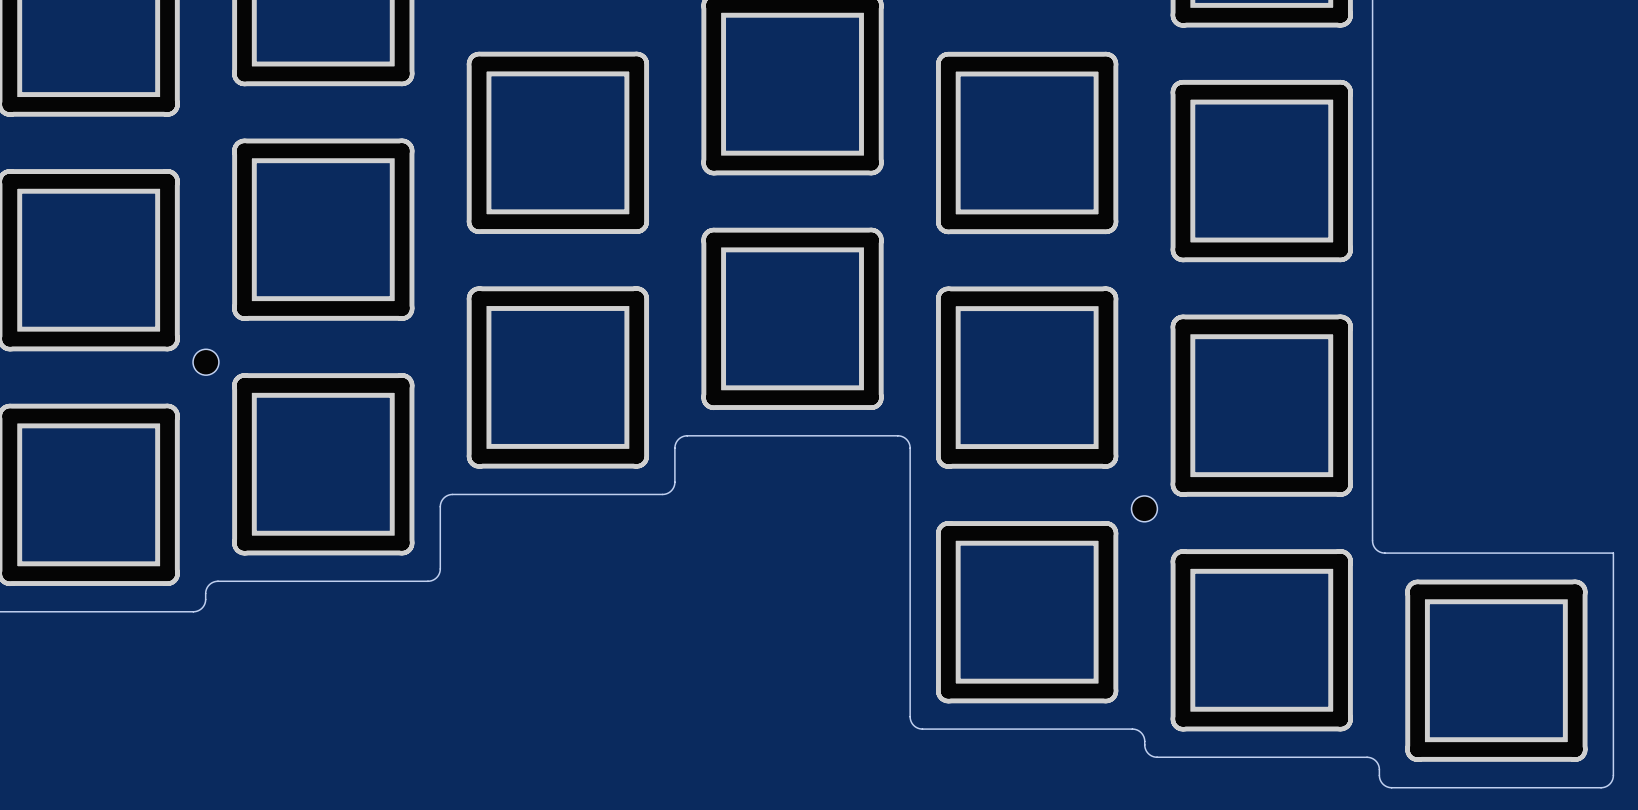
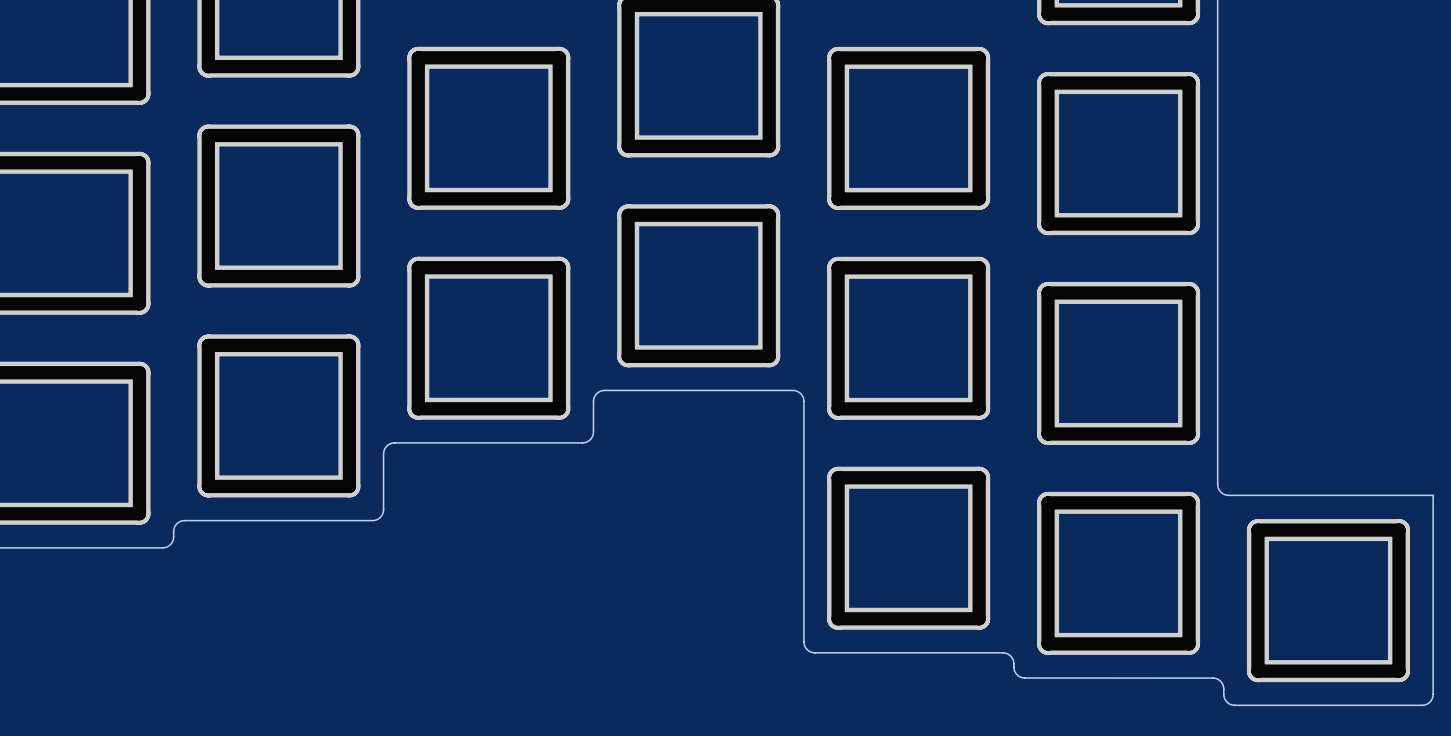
part: (205, 362) -> none
part: (1144, 508) -> none

